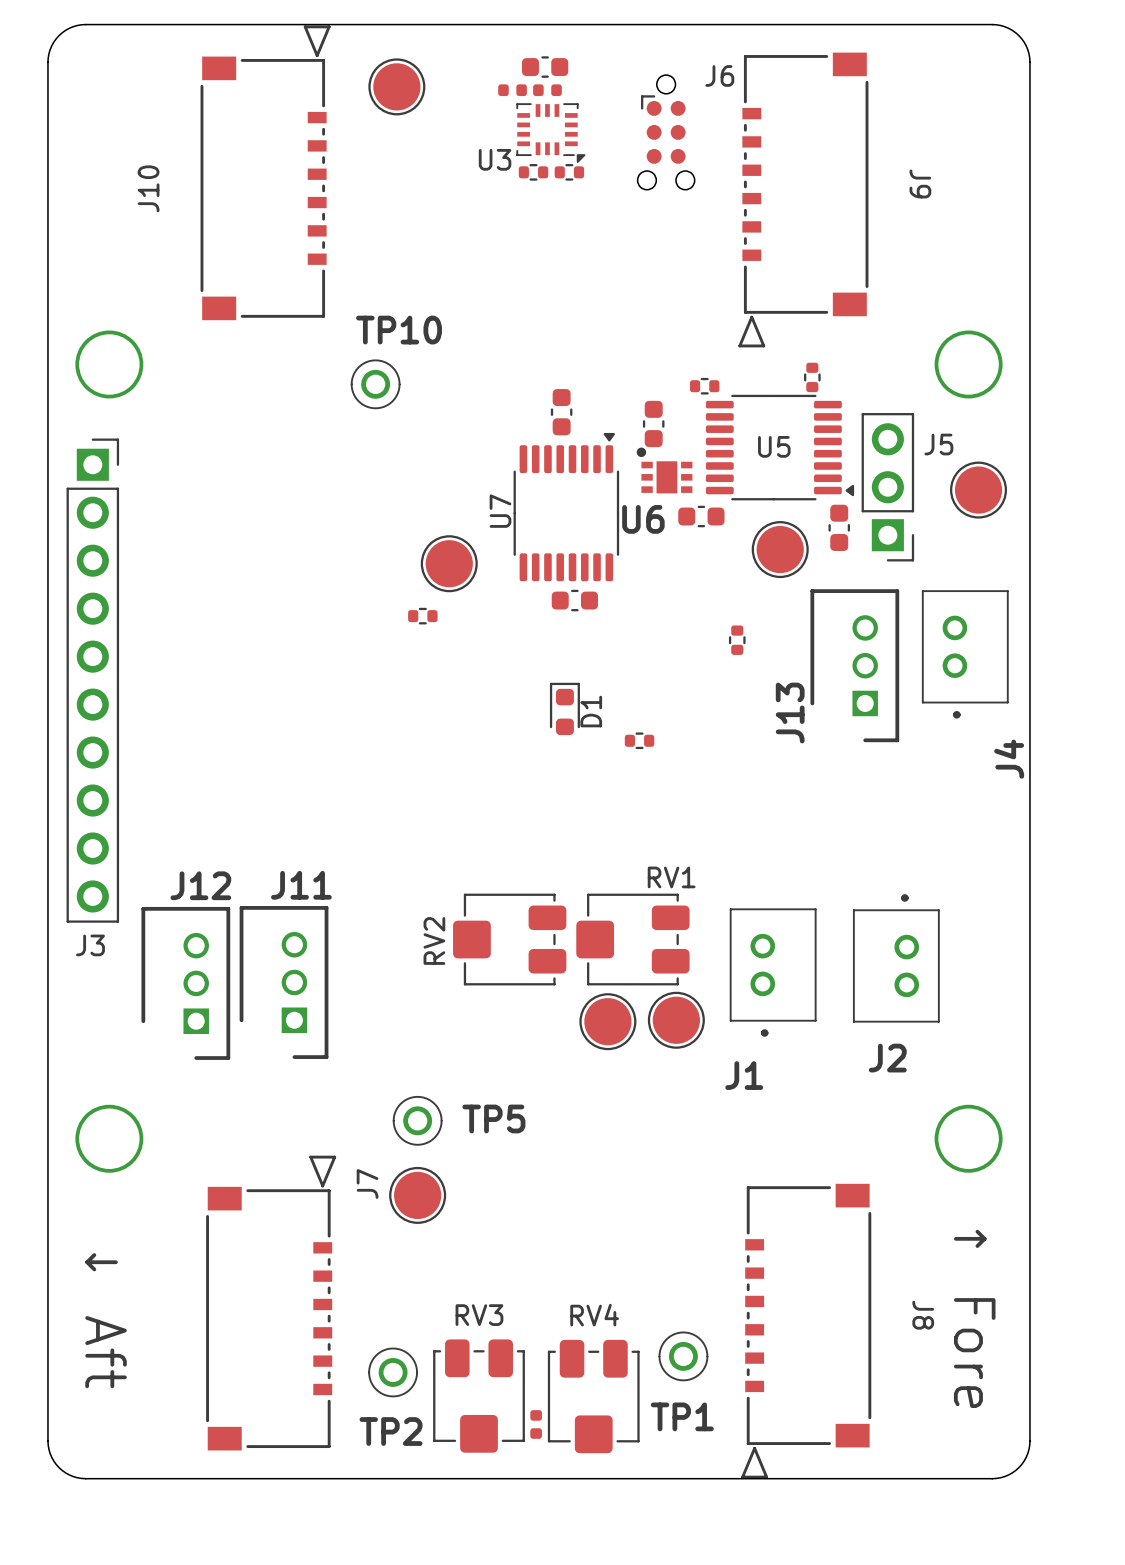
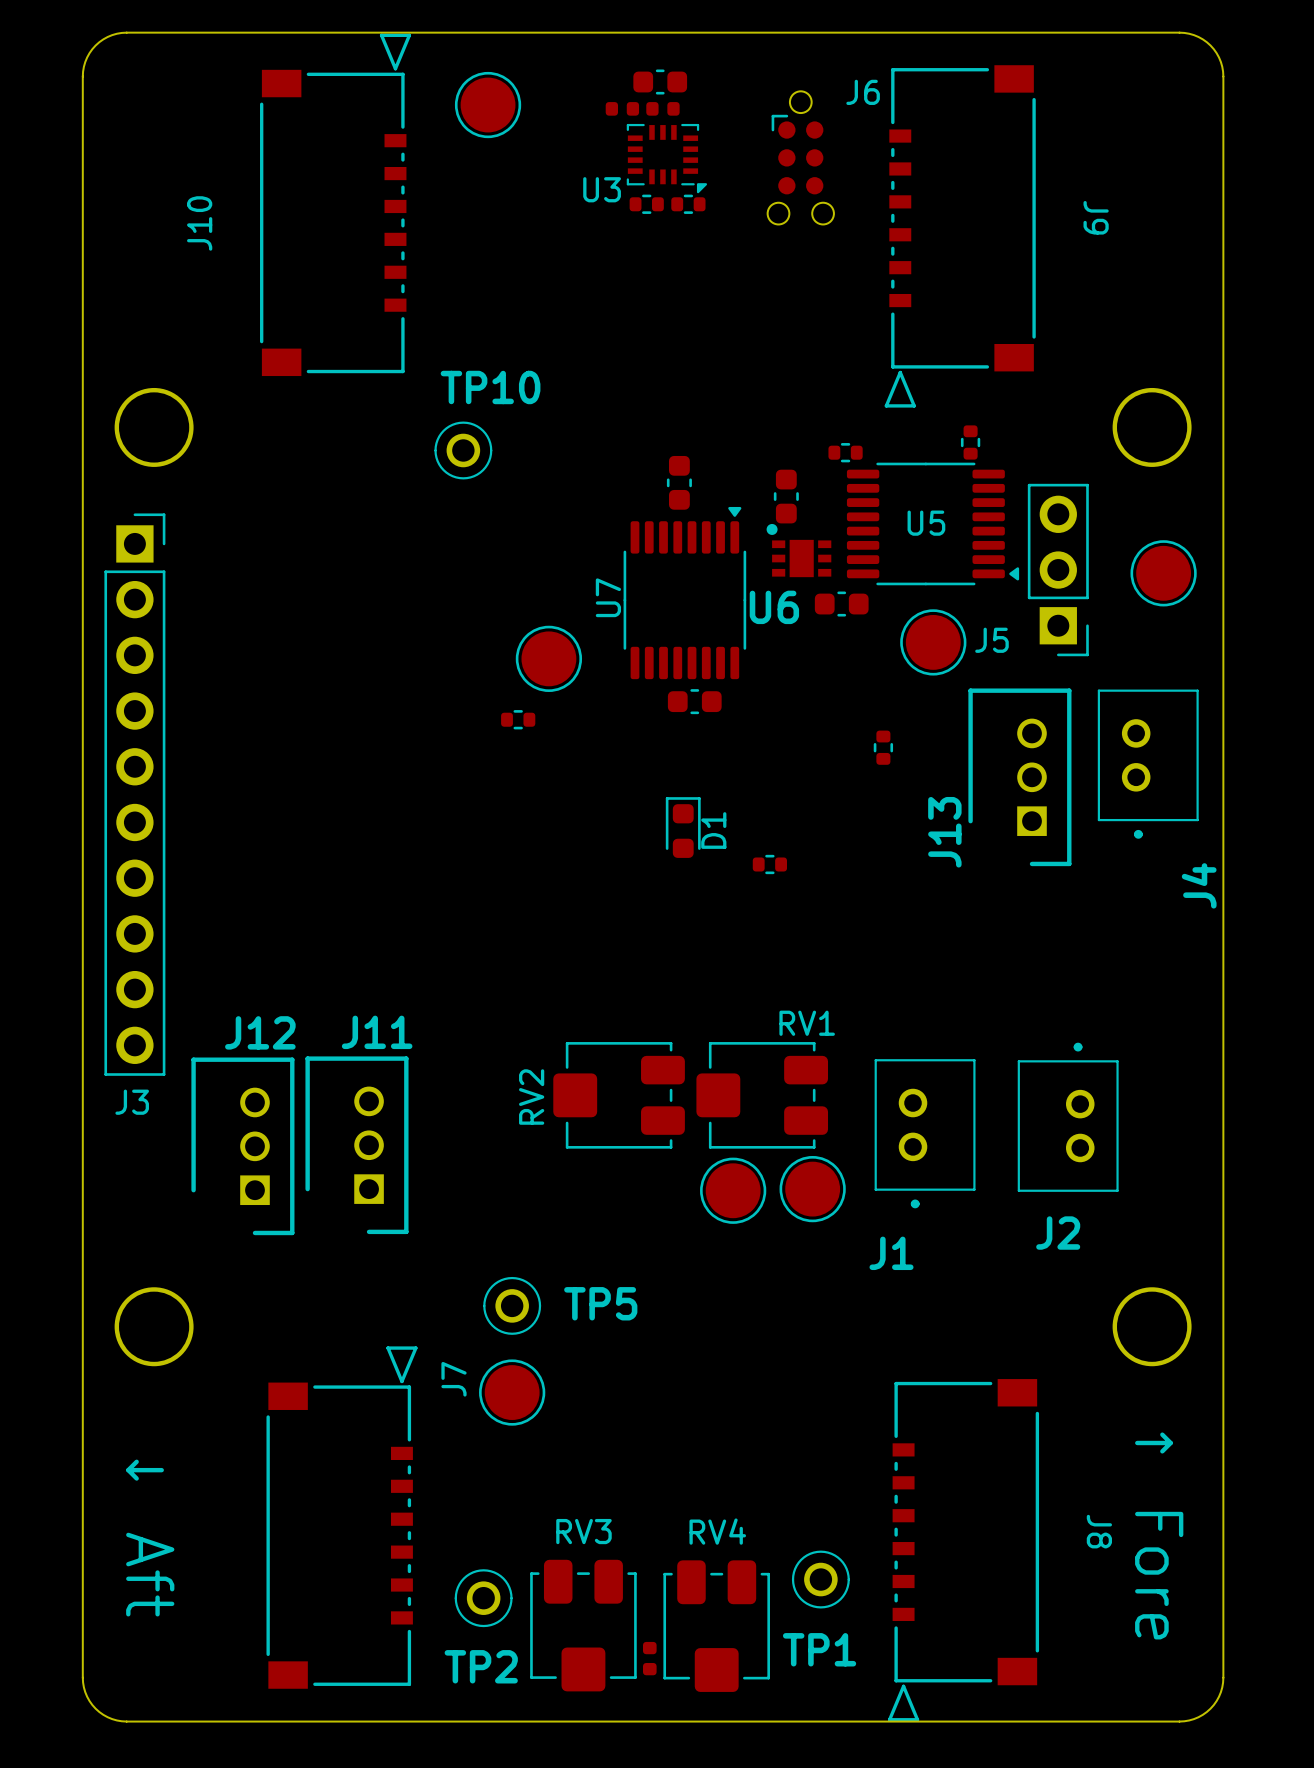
J5 name position: J5 (938, 444) -> J5 (991, 640)
part: (839, 527) -> none

